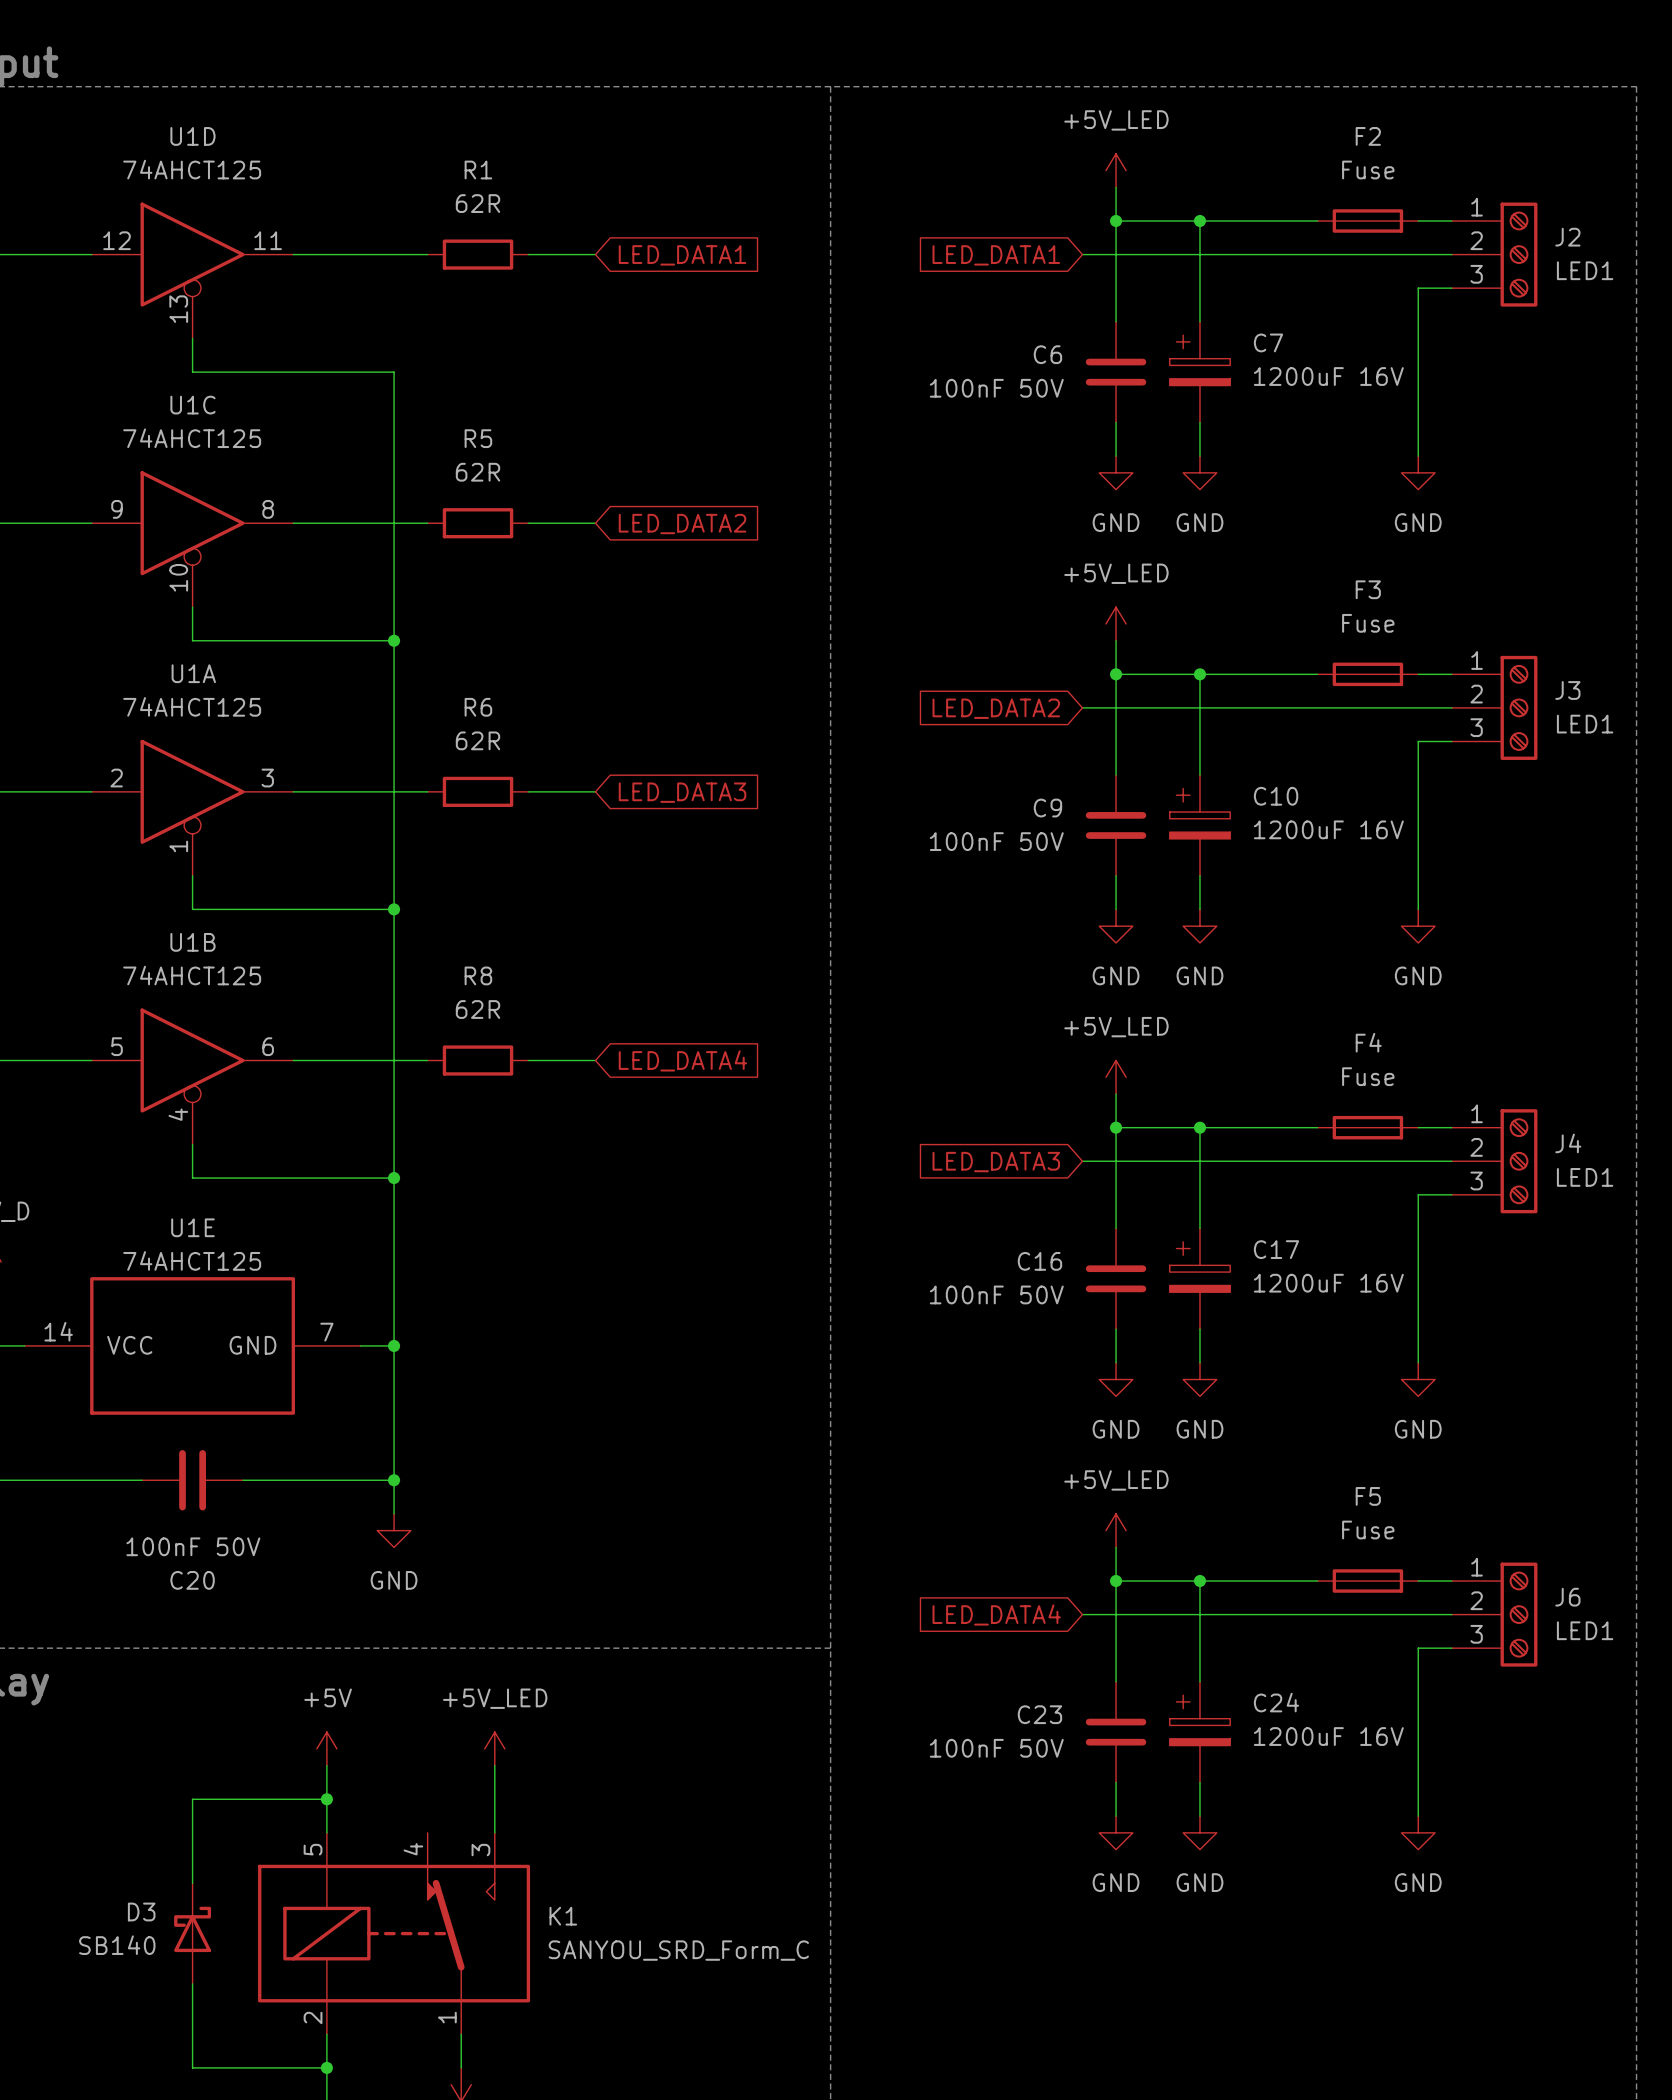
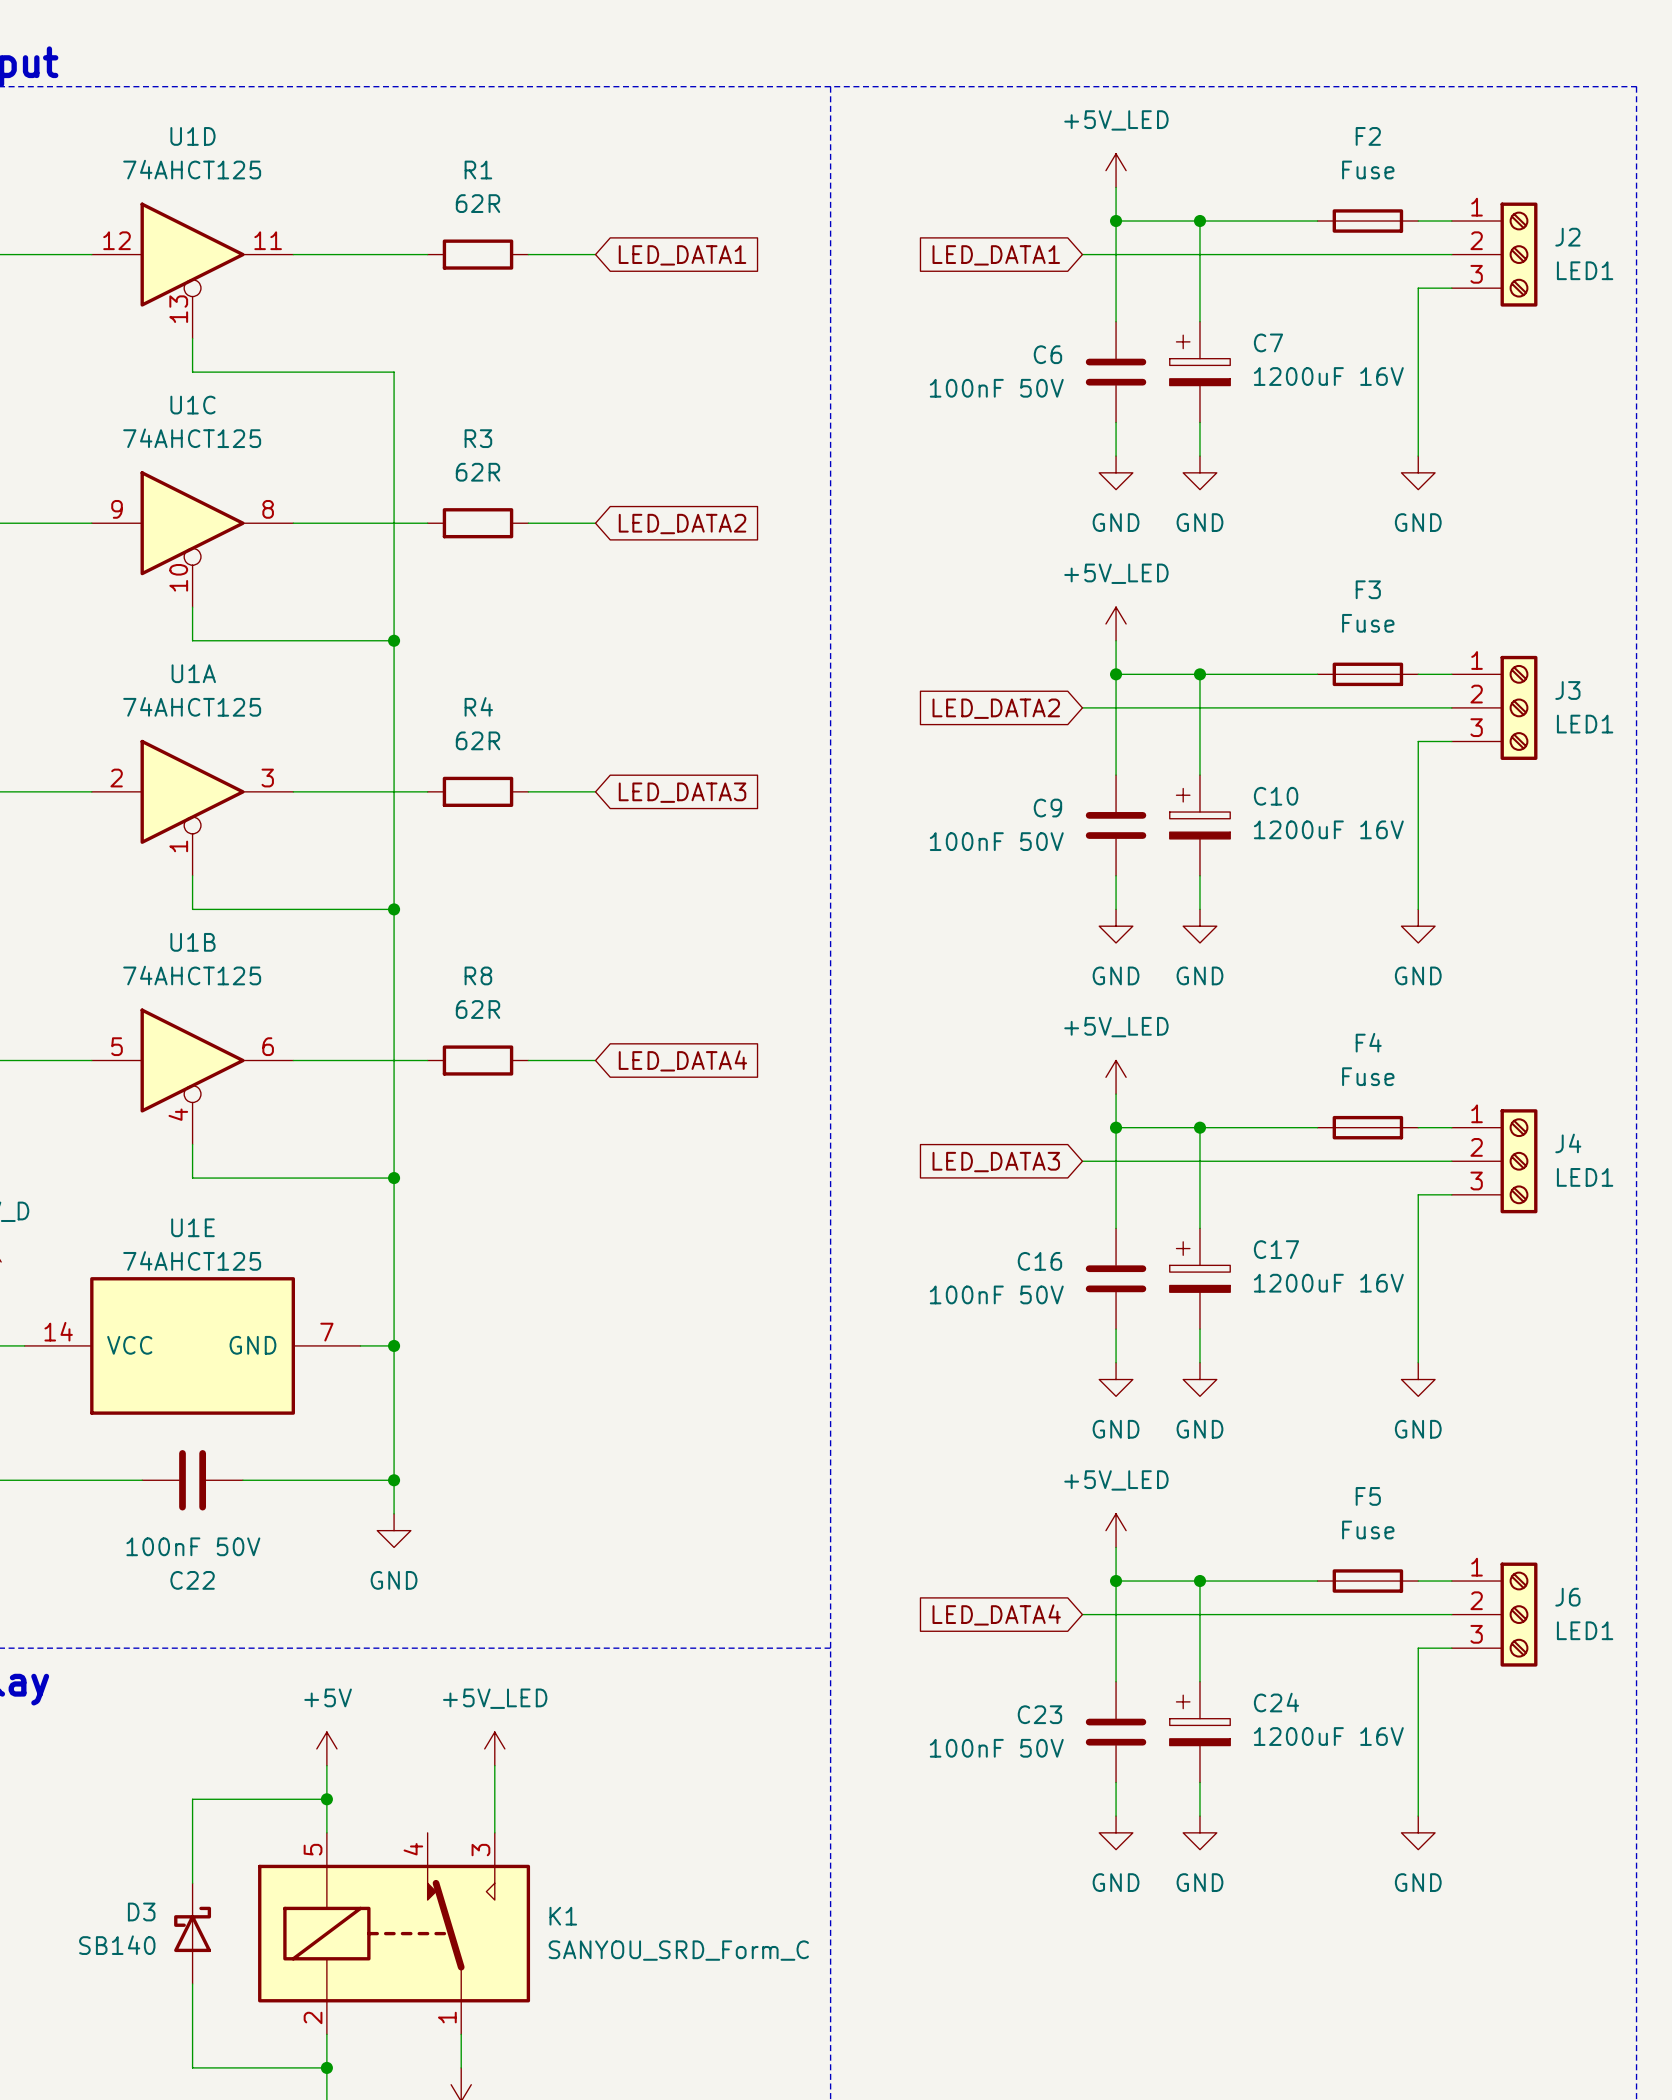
R5 name: R5 (478, 438) -> R3 (478, 438)
R6 name: R6 (478, 707) -> R4 (478, 706)
C20 name: C20 (192, 1580) -> C22 (192, 1580)

